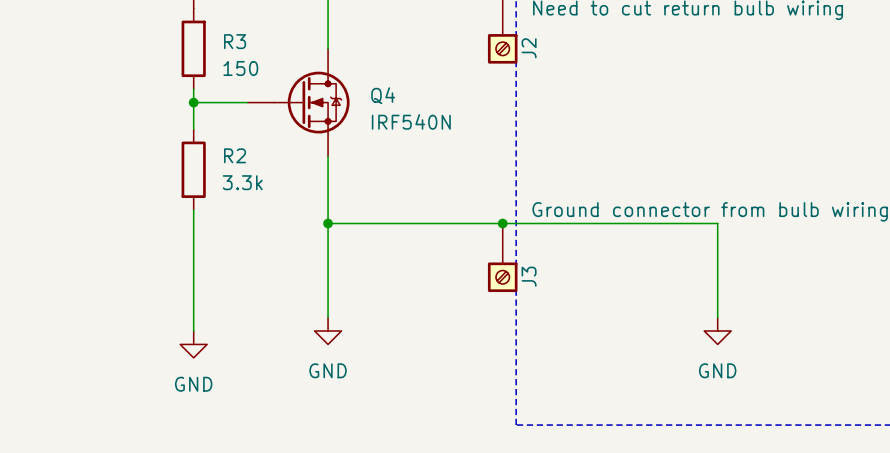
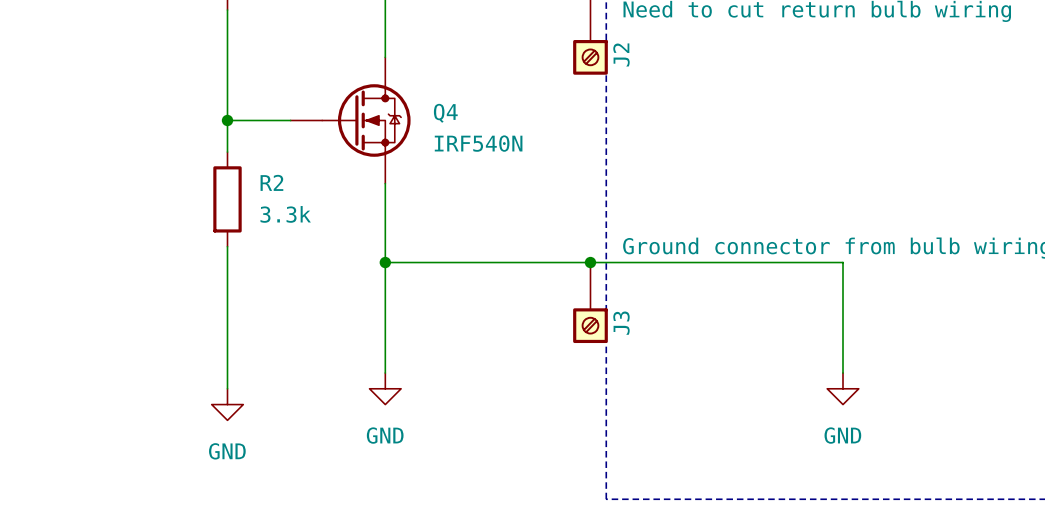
wire: none -> (227, 10) (227, 104)
R3: 150 (193, 48) -> none

